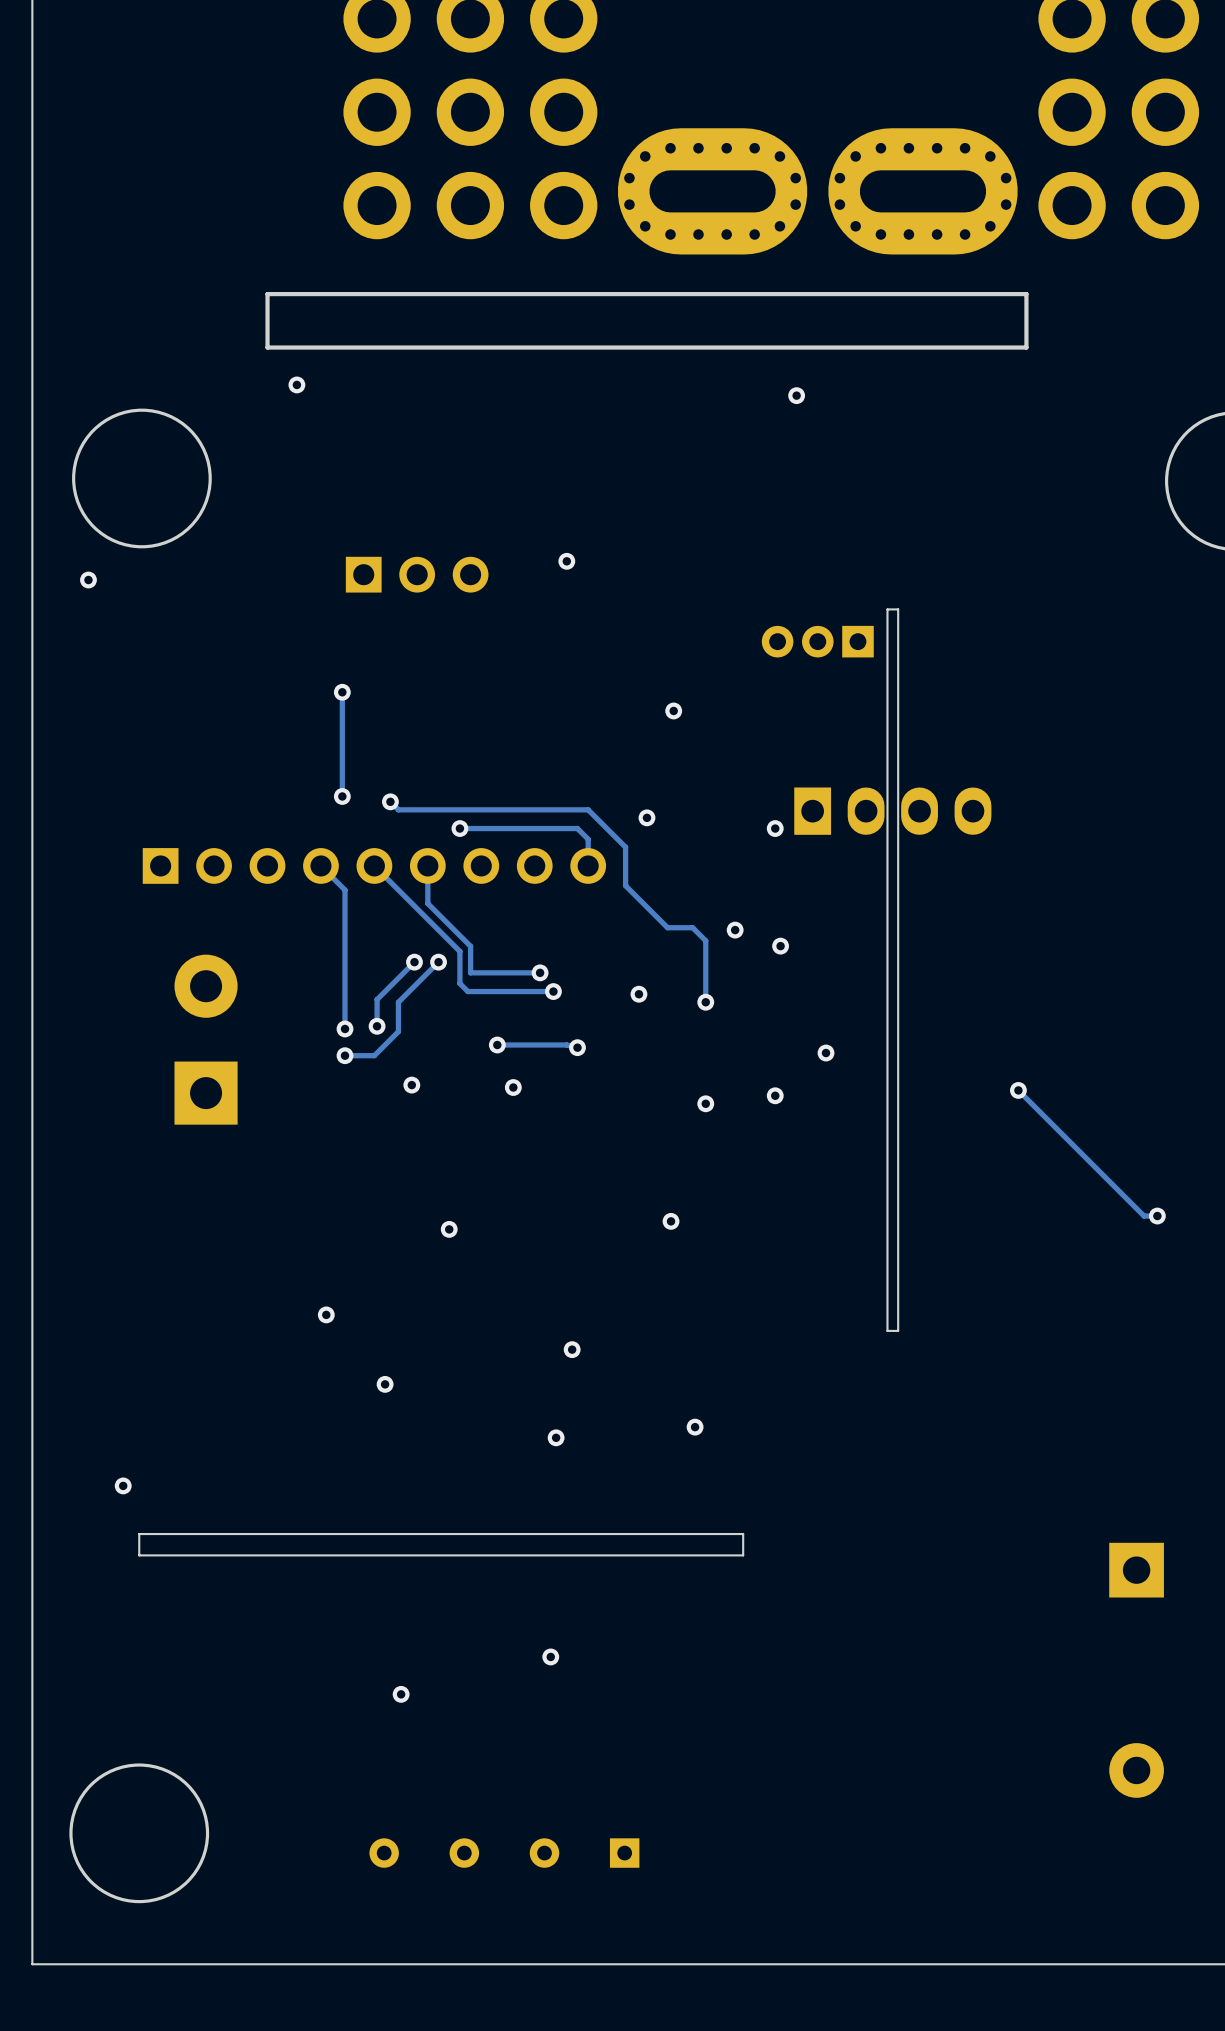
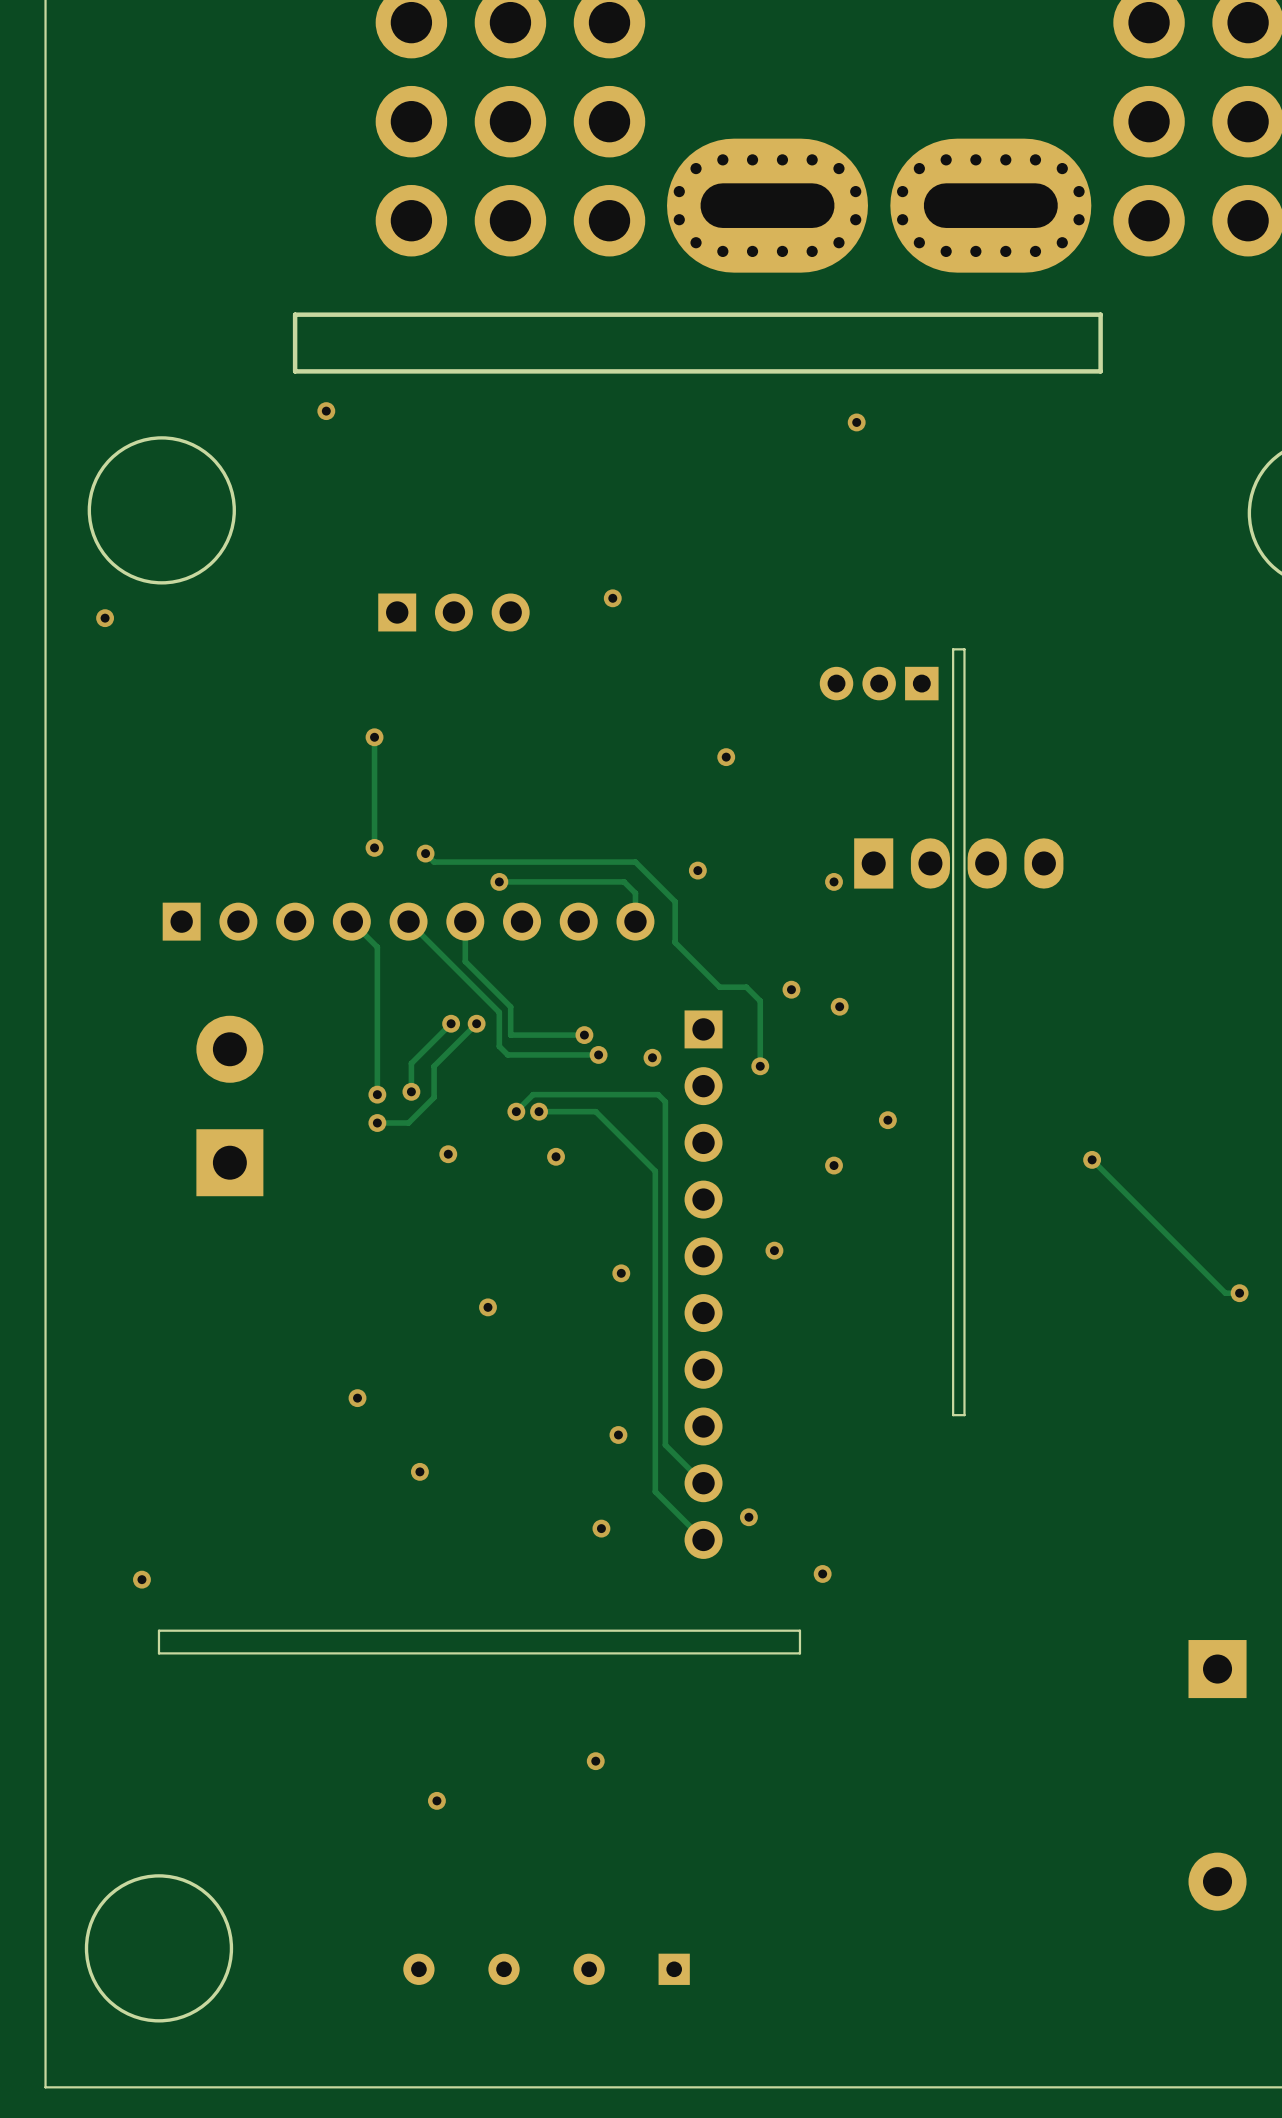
via: none -> (652, 1057)
via: (638, 994) -> none
track: none -> (516, 1111) (533, 1094) (658, 1094) (665, 1101) (665, 1445) (703, 1483)
via: none -> (516, 1111)
track: (550, 1045) (566, 1045) (577, 1047) -> (595, 1111) (655, 1171) (655, 1491) (703, 1539)
via: (577, 1047) -> none
via: (705, 1103) -> none
via: none -> (774, 1250)
via: none -> (621, 1273)
part: none -> (703, 1284)
via: (671, 1221) -> none
via: none -> (822, 1573)

